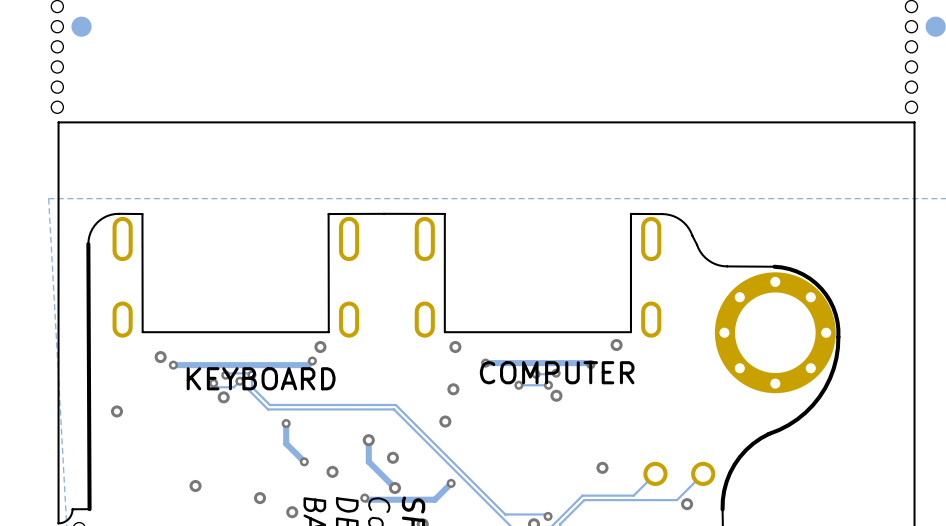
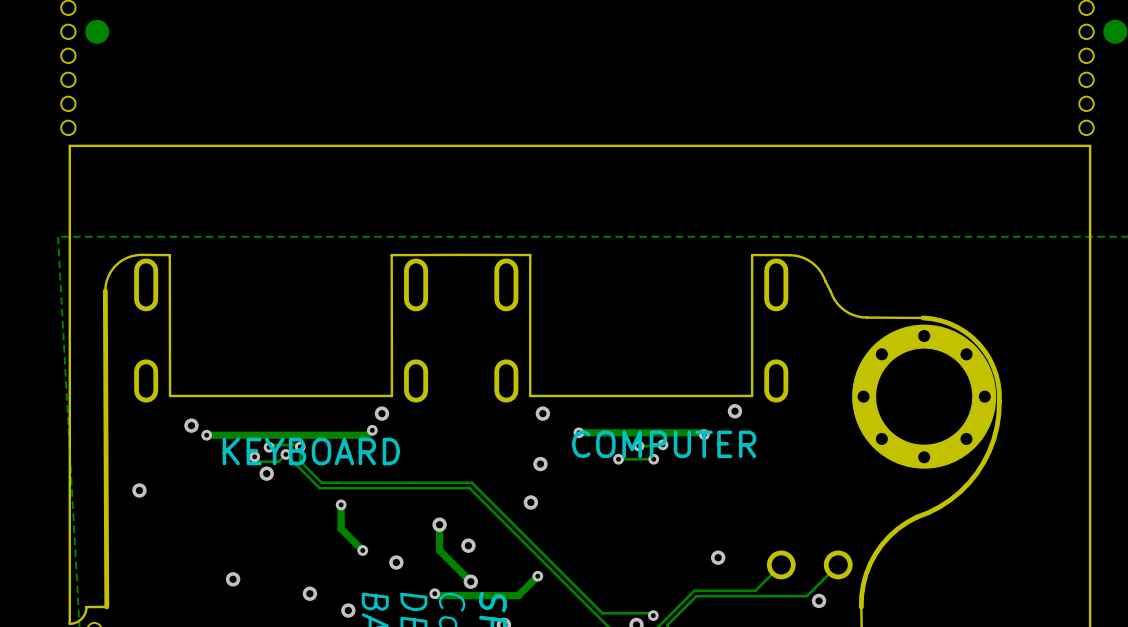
via: (556, 395) -> none

